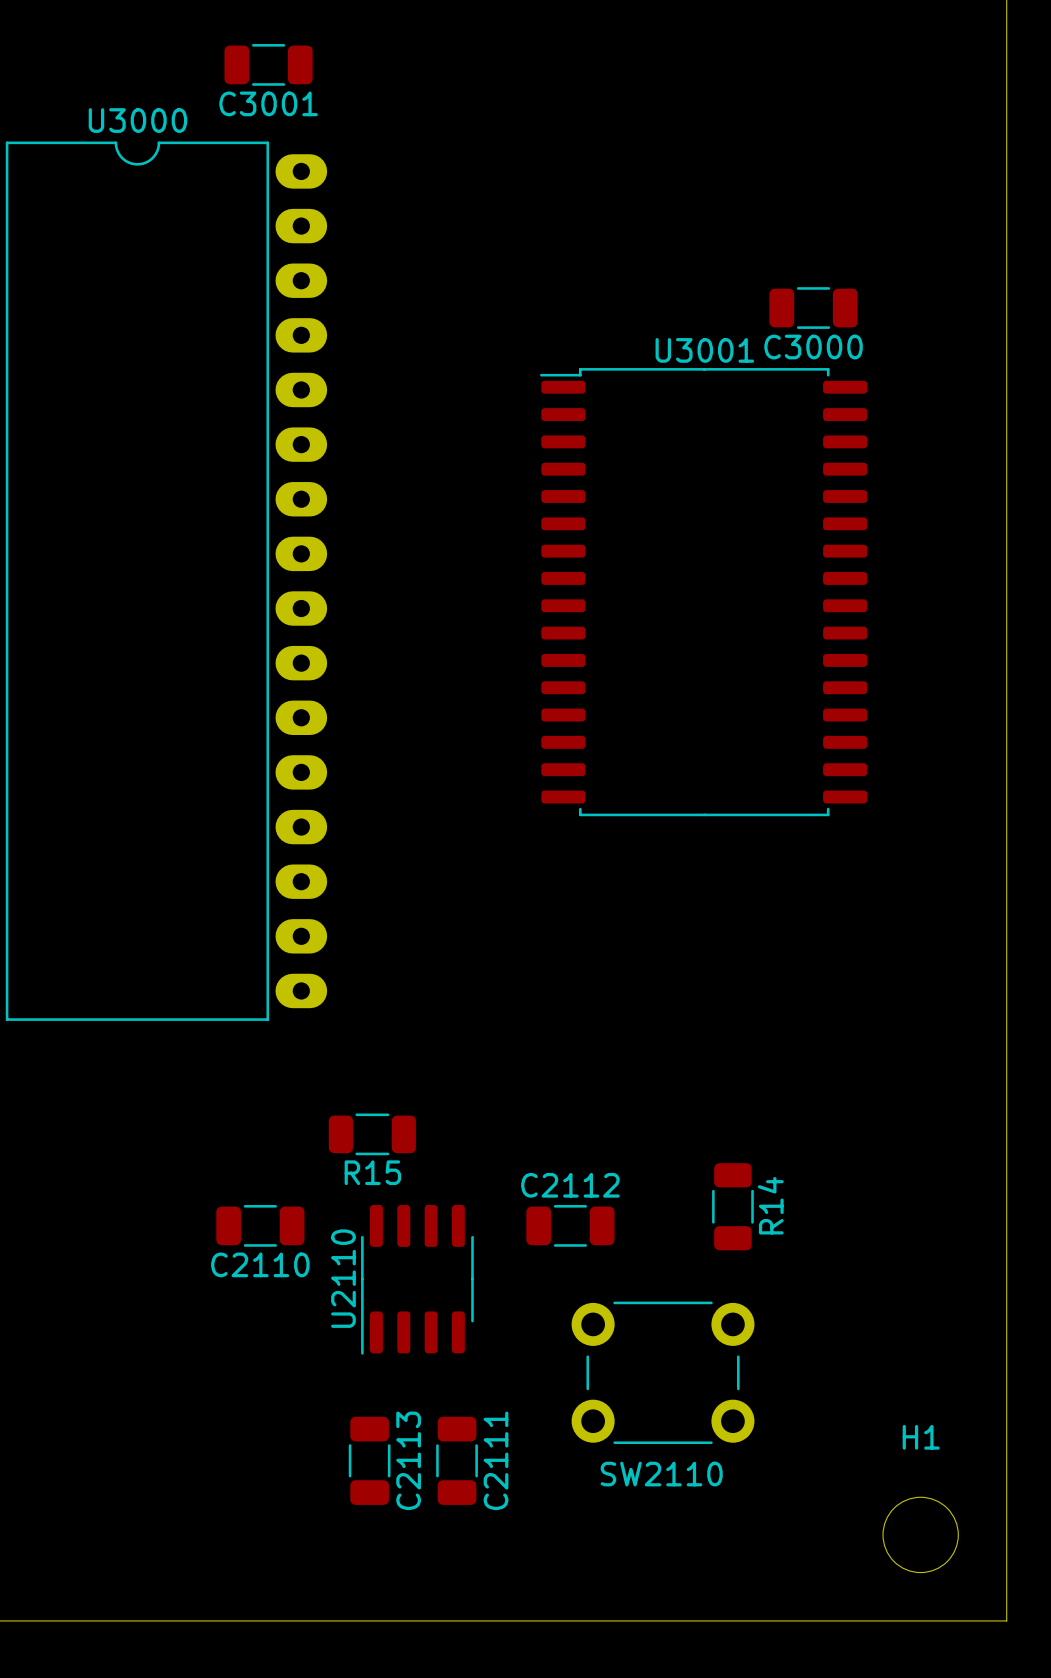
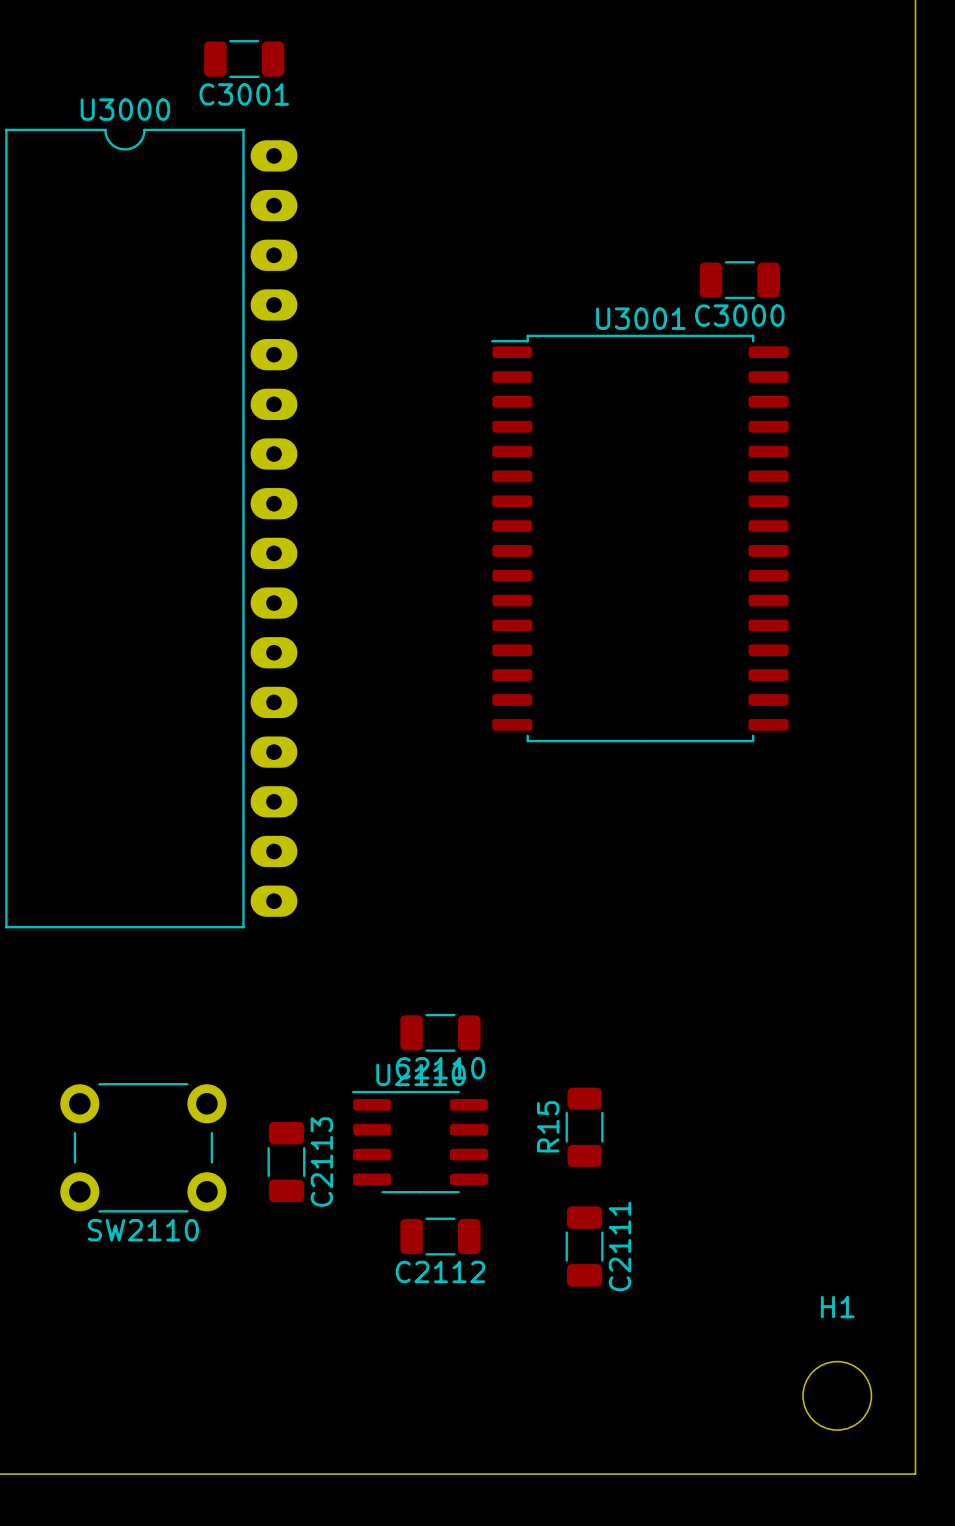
R15 rotation: 0° (372, 1134) -> 90° clockwise (584, 1127)
R15 position: (372, 1134) -> (584, 1127)
C2112 name position: C2112 (570, 1185) -> C2112 (440, 1271)
R14: (732, 1206) -> none
C2110 position: (260, 1225) -> (440, 1032)
C2112 position: (570, 1225) -> (440, 1236)
U2110 rotation: 0° (417, 1279) -> 90° clockwise (420, 1142)
SW2110 position: (663, 1372) -> (143, 1147)
C2113 position: (369, 1460) -> (286, 1162)
C2111 position: (457, 1460) -> (584, 1246)
SW2110 name position: SW2110 (661, 1474) -> SW2110 (143, 1230)

